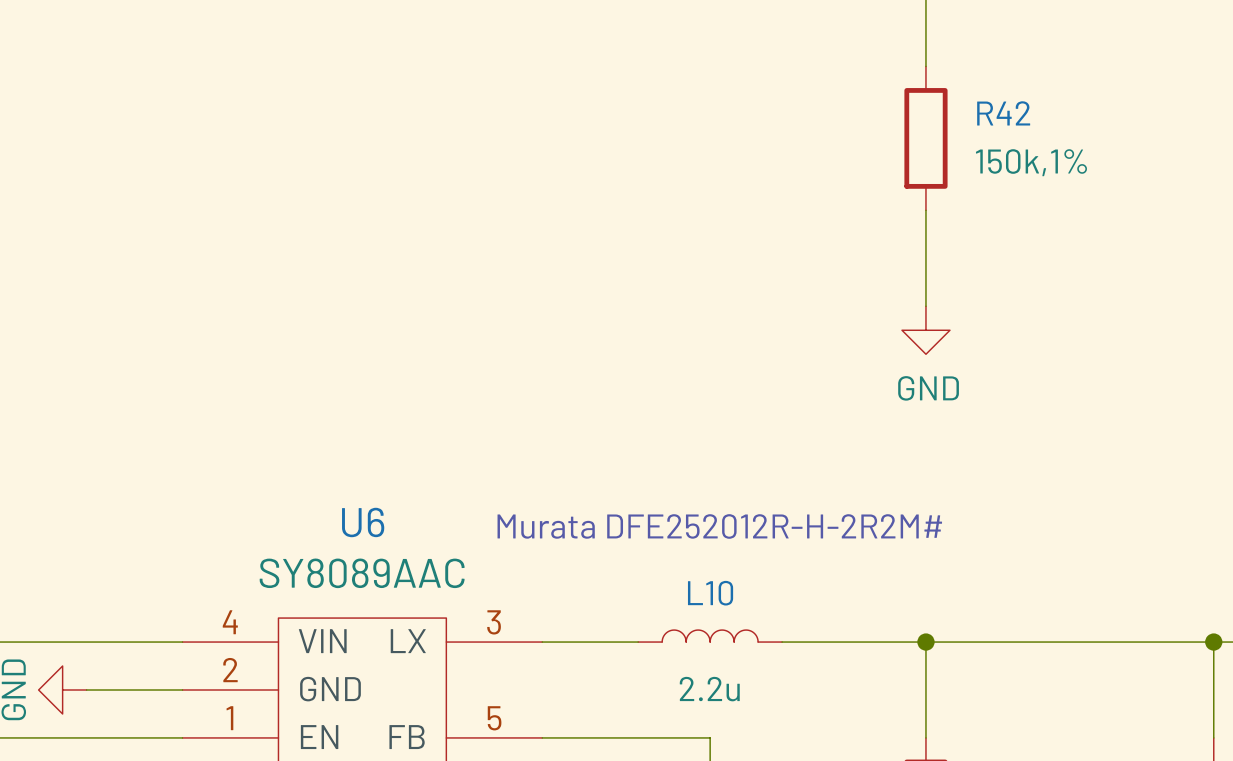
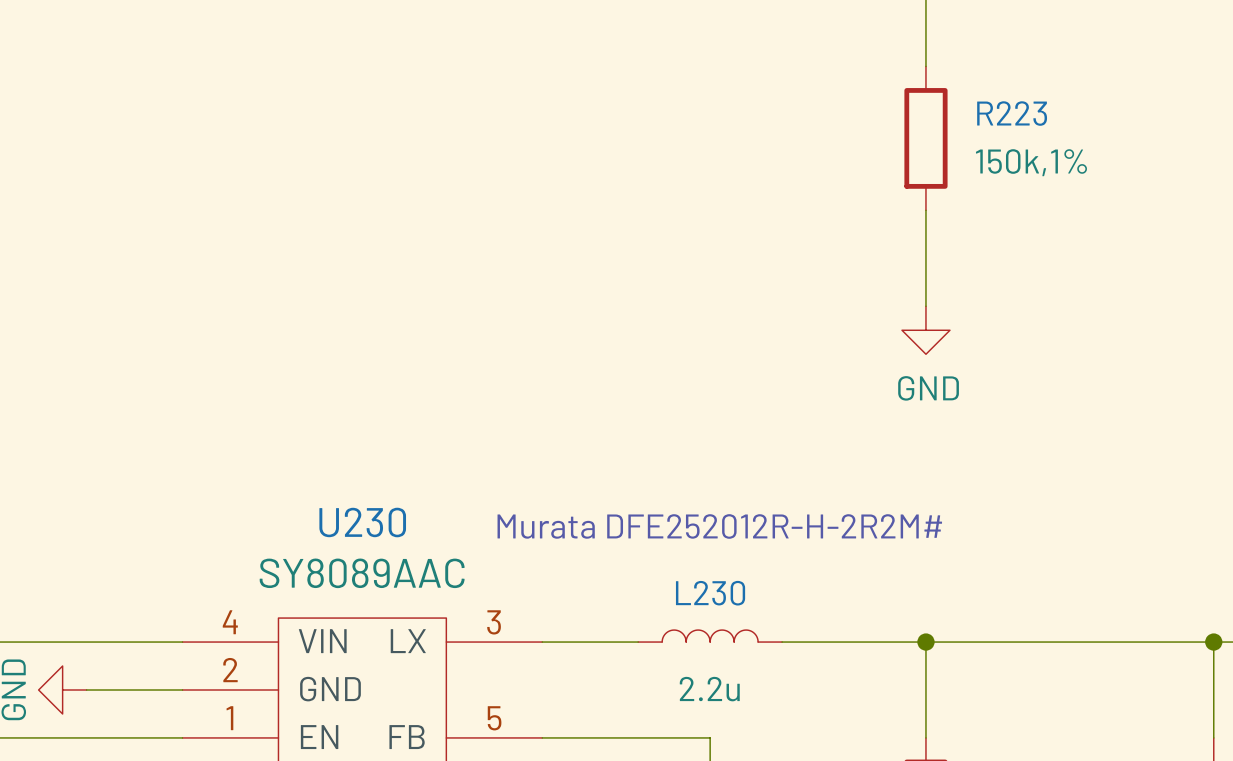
R42 name: R42 (1003, 113) -> R223 (1012, 113)
U6 name: U6 (363, 522) -> U230 (362, 522)
L10 name: L10 (710, 593) -> L230 (710, 593)

